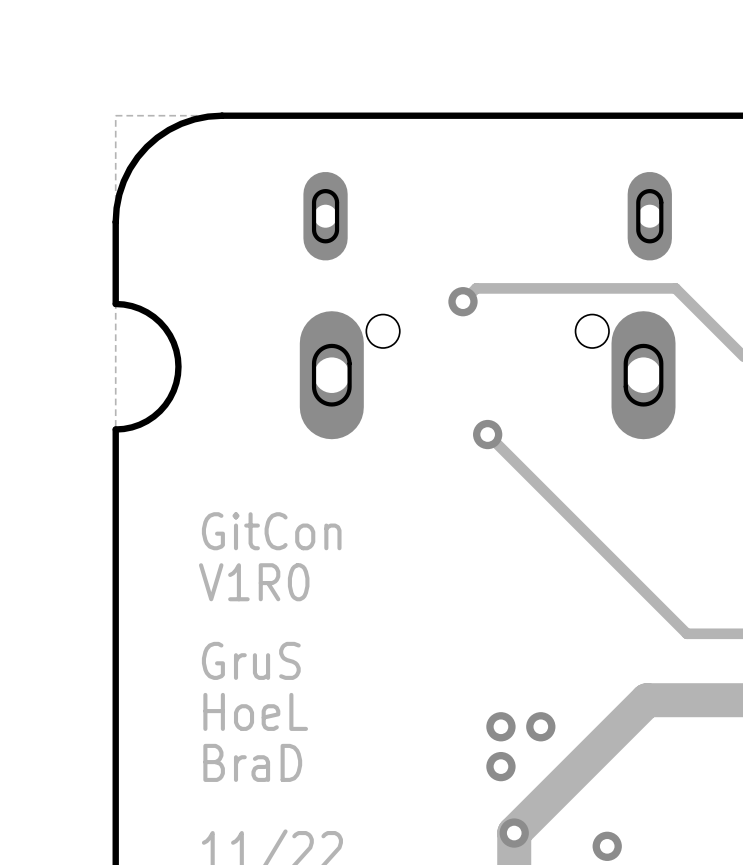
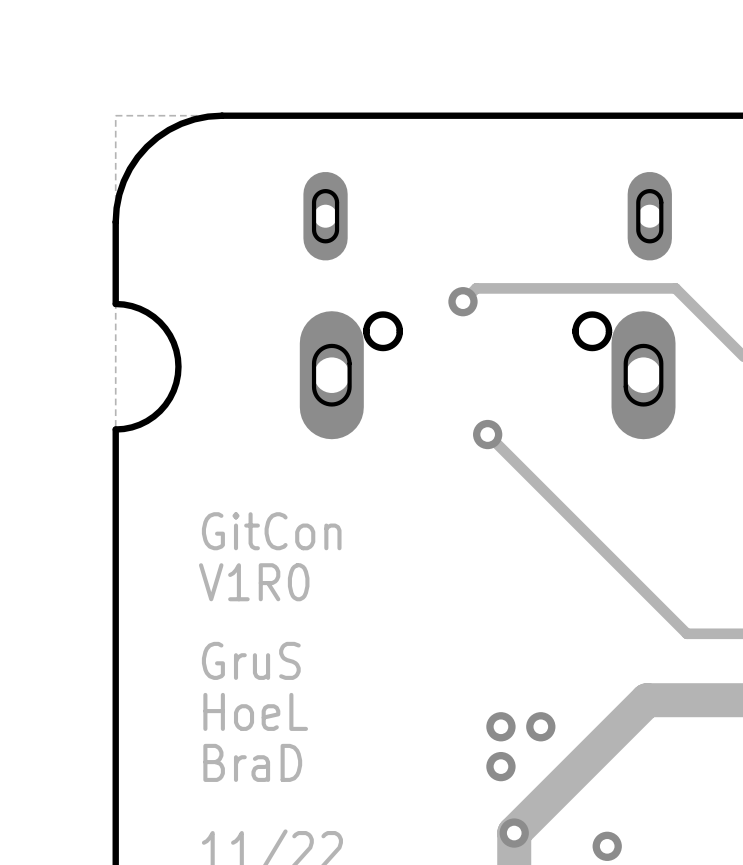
board edge: none -> (399, 330) (395, 341) (385, 347) (378, 347) (371, 343) (366, 332) (370, 320) (380, 314) (387, 315) (394, 319) (399, 330)
board edge: none -> (609, 330) (605, 341) (594, 347) (588, 347) (580, 343) (575, 332) (579, 320) (590, 314) (596, 315) (603, 319) (609, 330)

